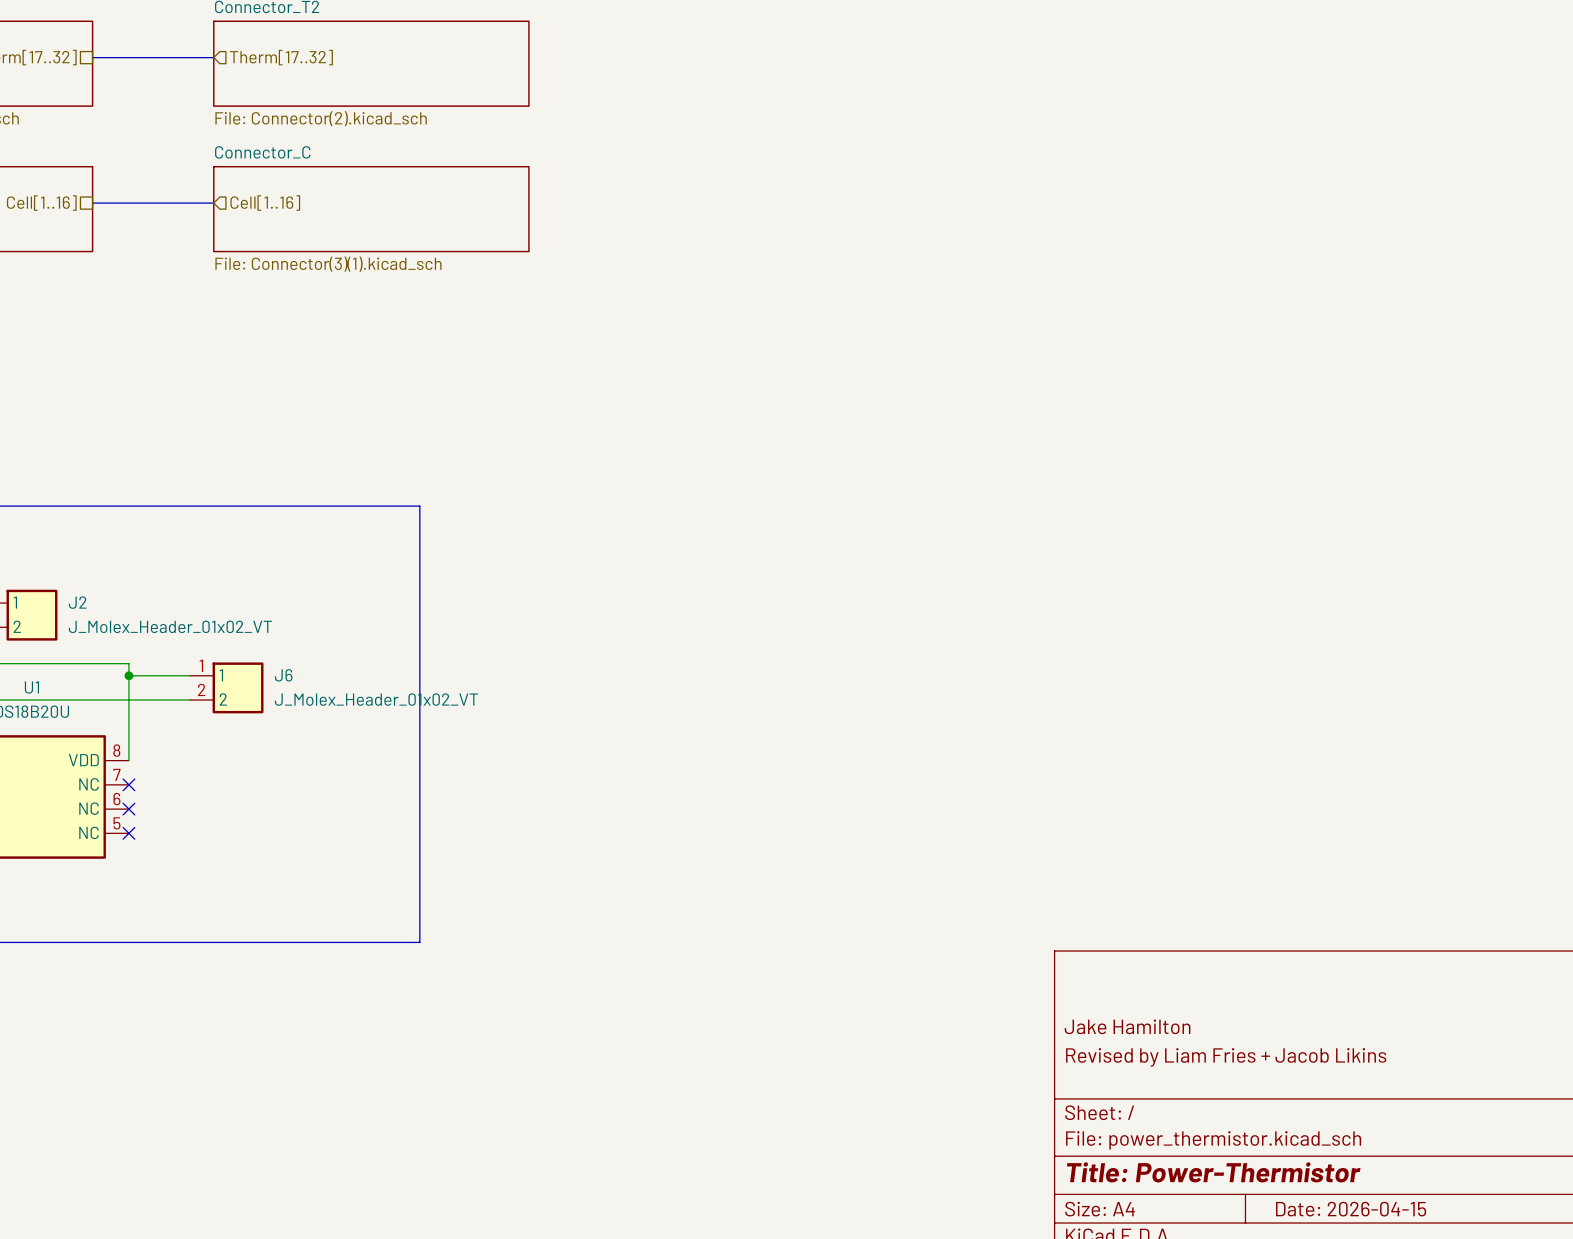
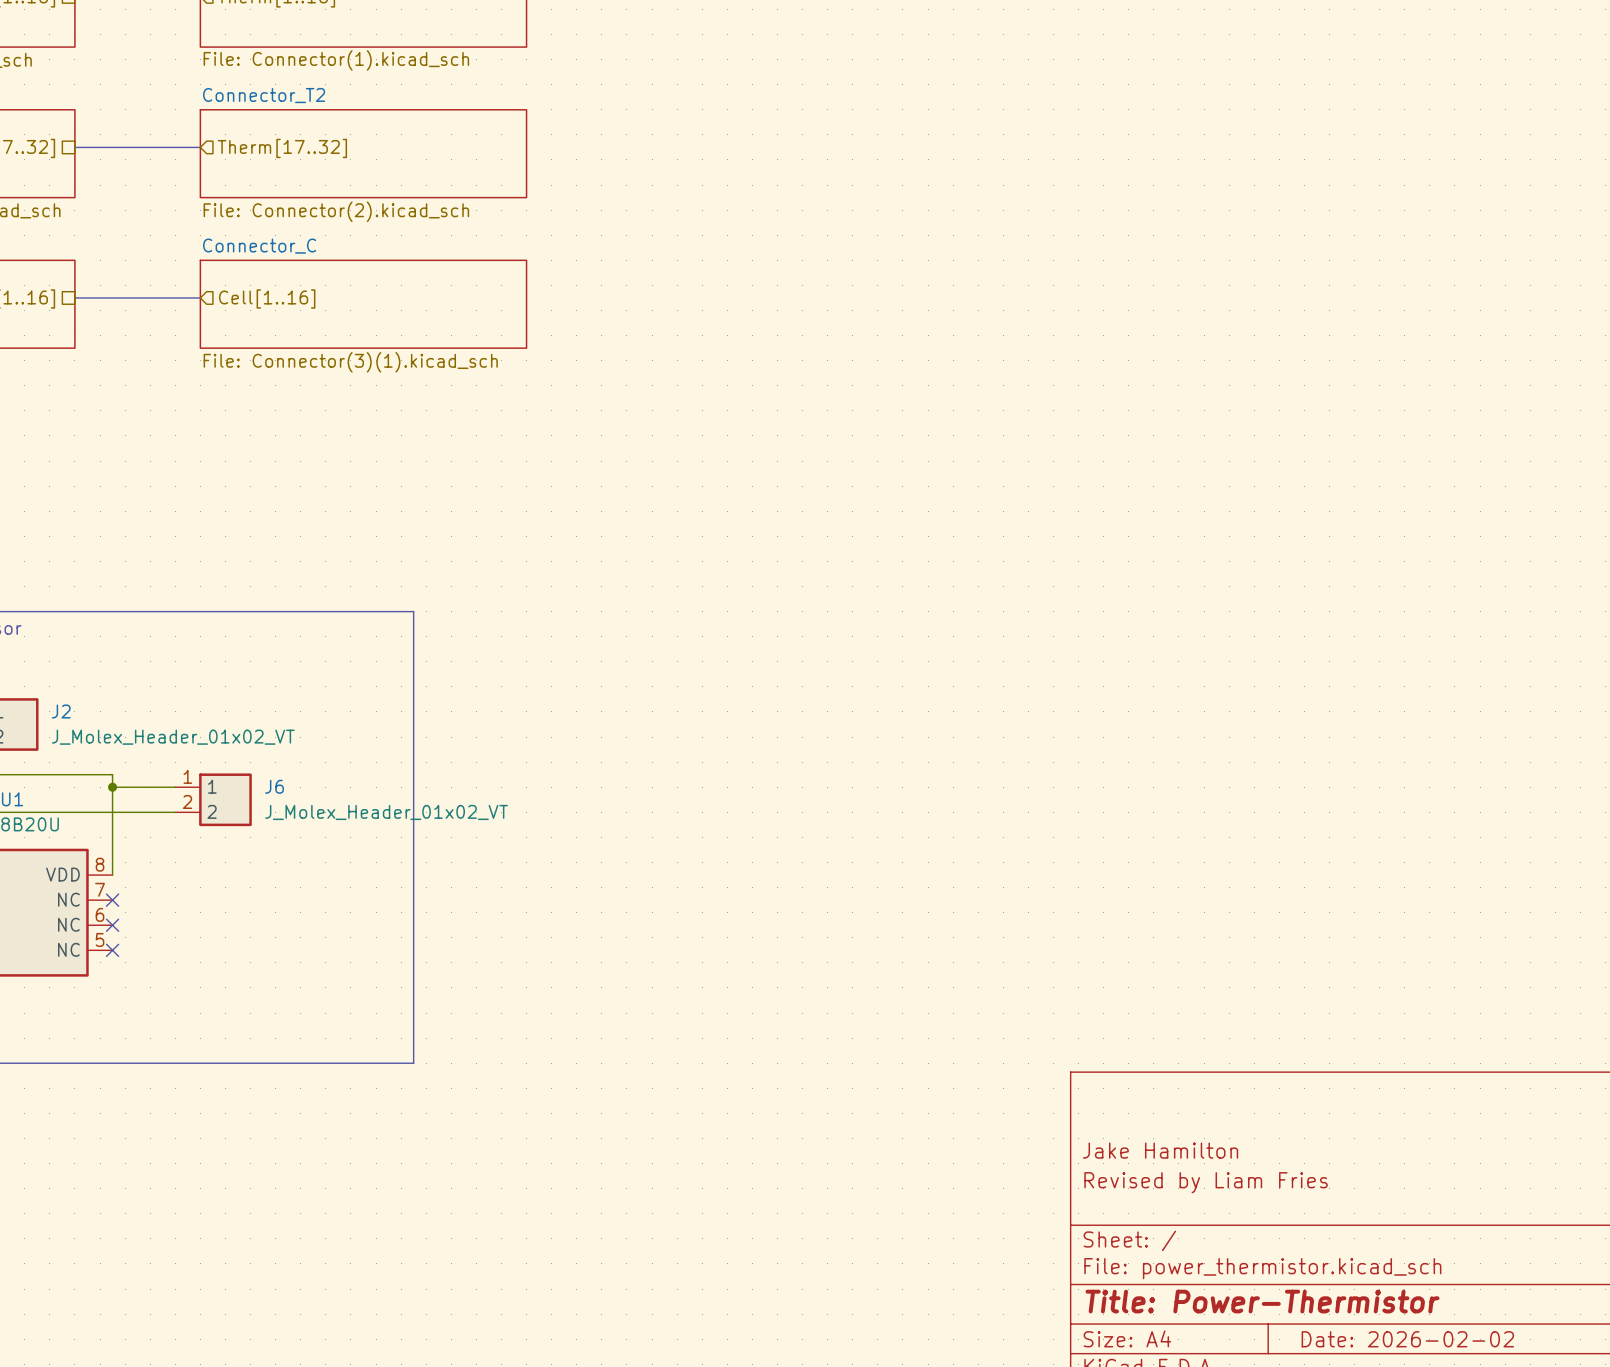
title block: Revised by Liam Fries + Jacob Likins (1226, 1057) -> Revised by Liam Fries (1206, 1182)
title block: Date: 2026-04-15 (1351, 1209) -> Date: 2026-02-02 (1407, 1339)

